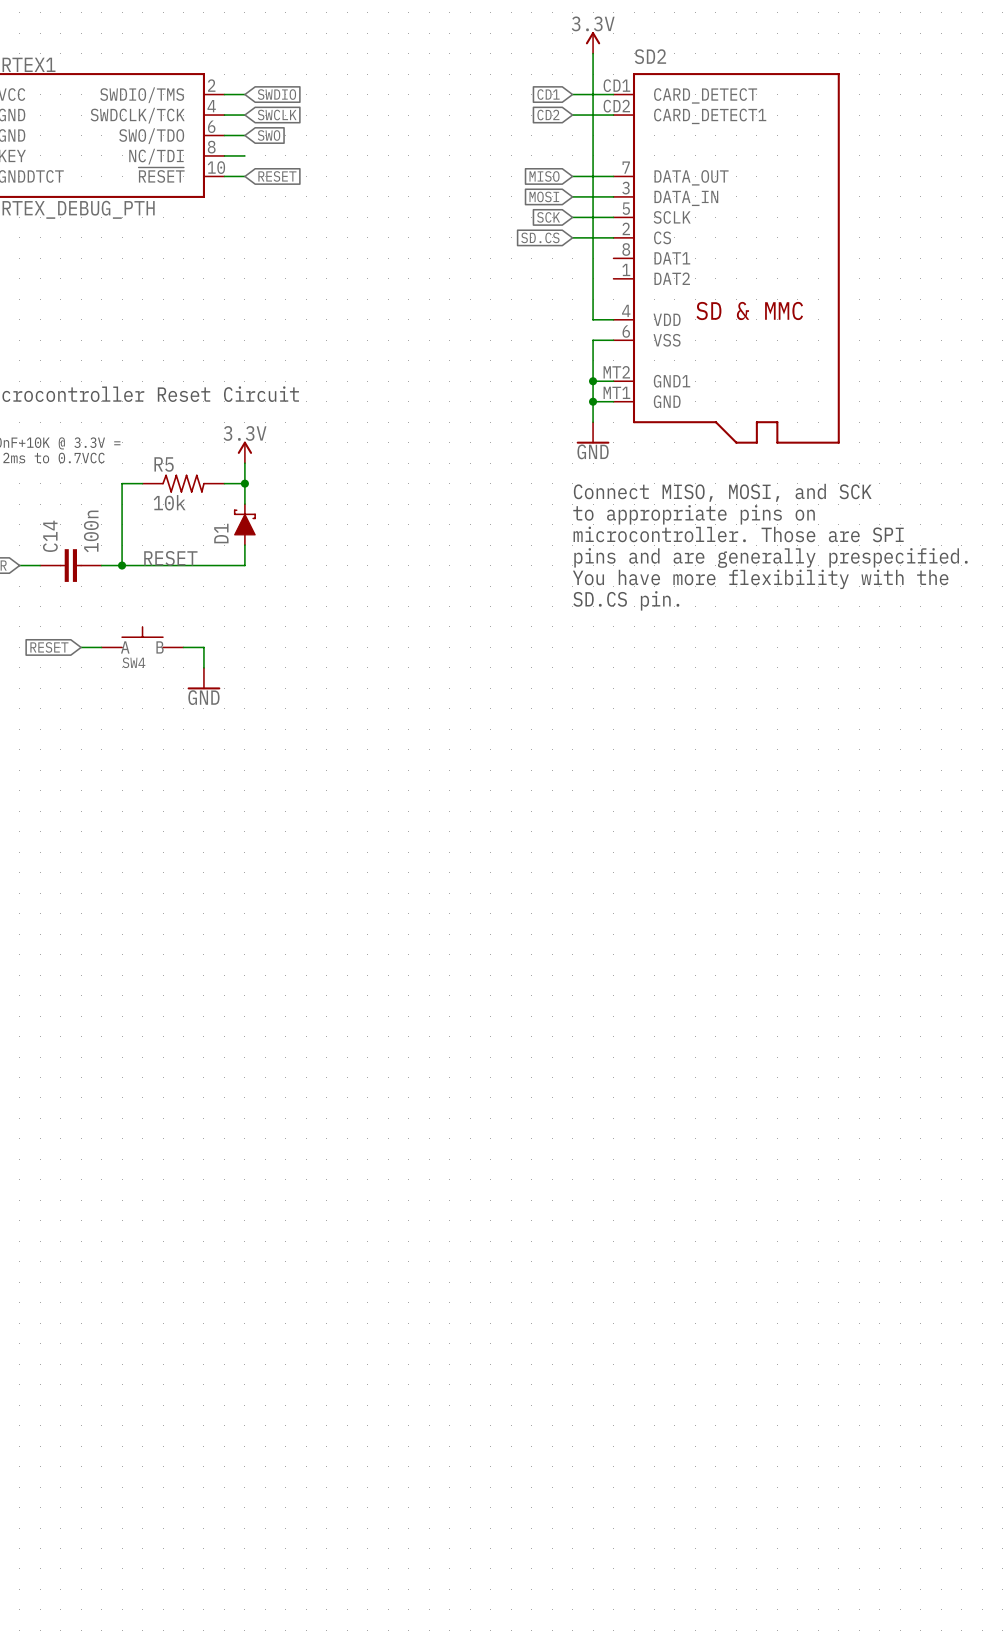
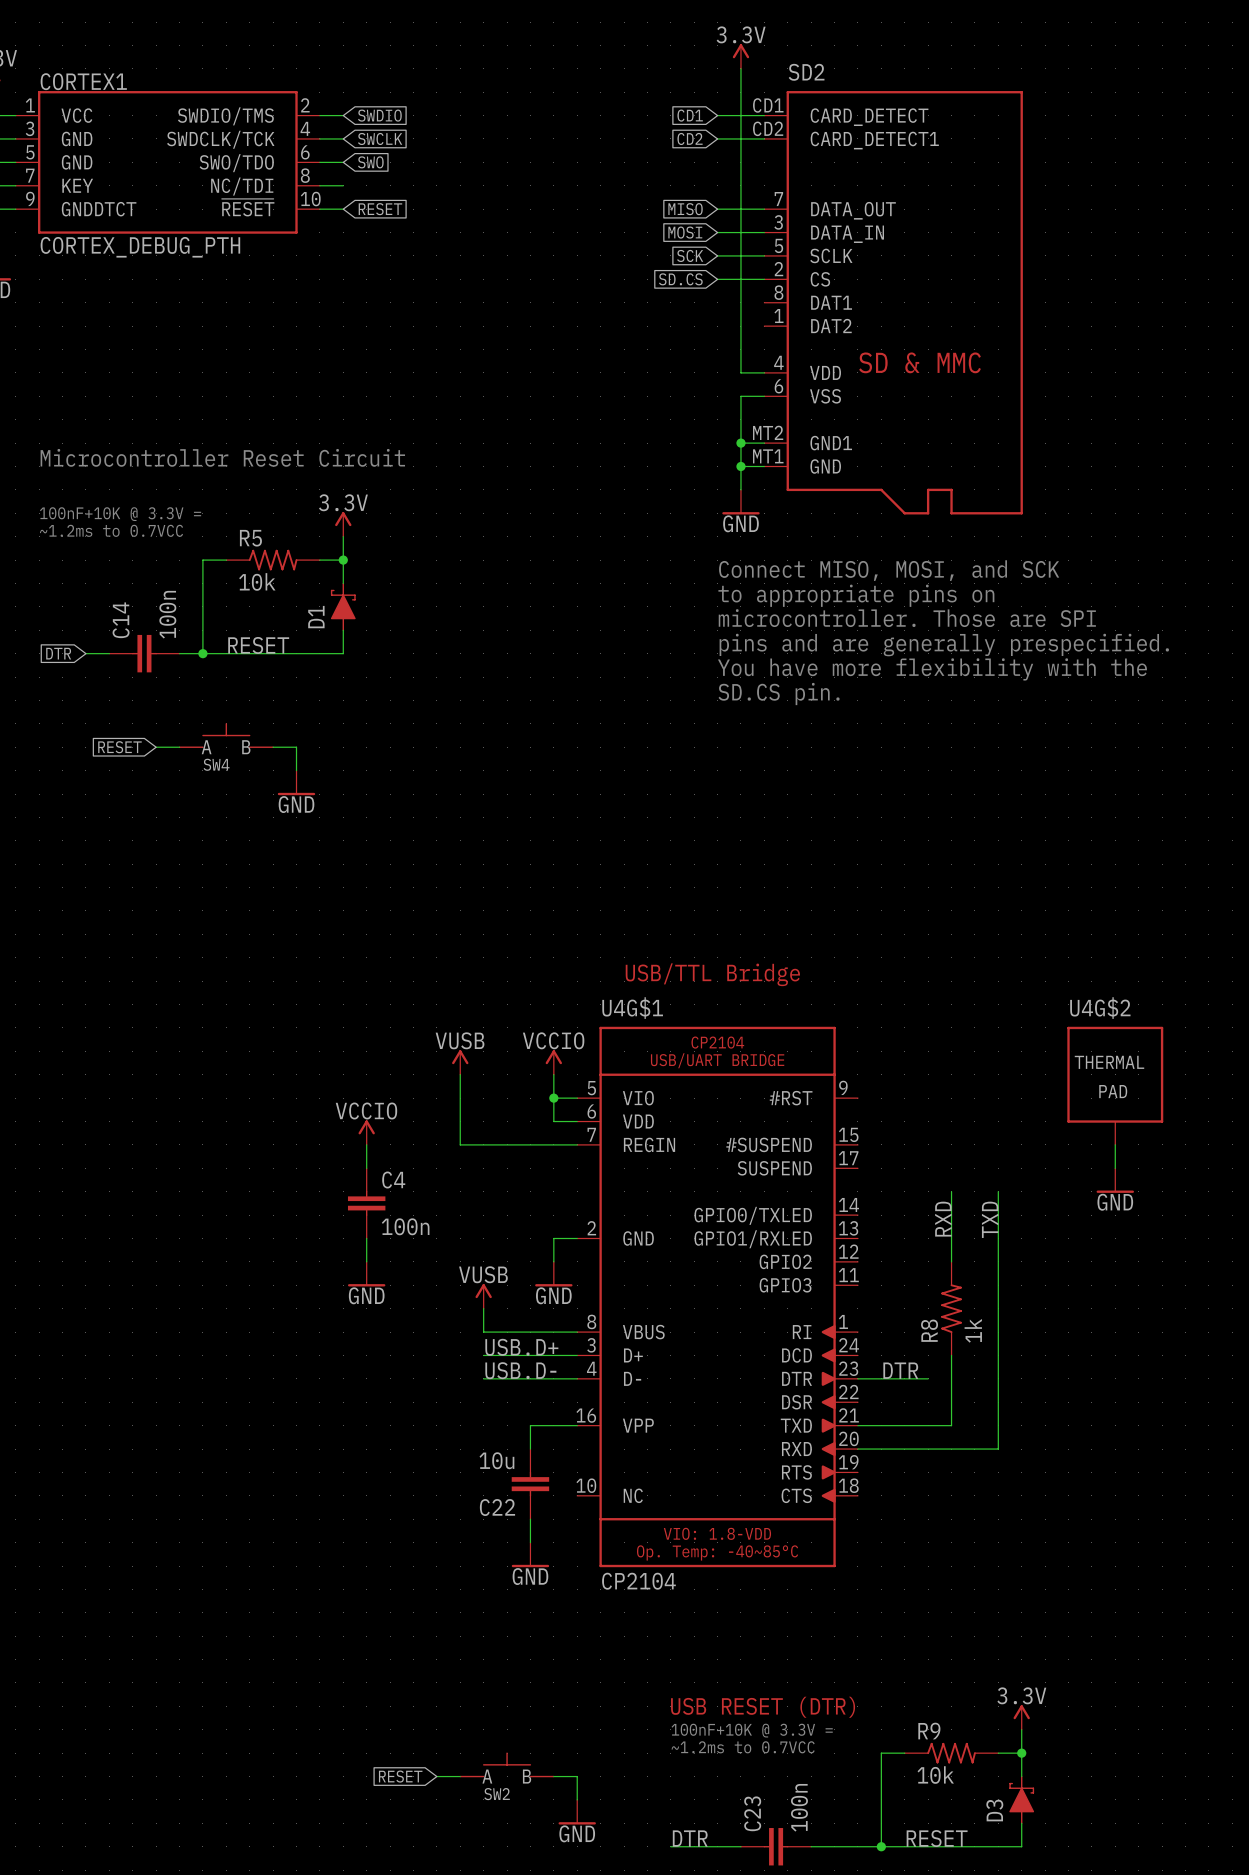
text: none -> USB/TTL Bridge (712, 974)
power symbol: none -> VUSB (460, 1062)
power symbol: none -> VCCIO (553, 1062)
wire: none -> (460, 1074) (460, 1144) (577, 1144)
wire: none -> (553, 1074) (553, 1121) (577, 1121)
U4G$2: none -> (1115, 1085)
wire: none -> (553, 1098) (577, 1098)
junction: none -> (553, 1098)
power symbol: none -> VCCIO (366, 1132)
wire: none -> (366, 1144) (366, 1168)
wire: none -> (1115, 1144) (1115, 1168)
power symbol: none -> GND (1115, 1180)
wire: none -> (951, 1191) (951, 1261)
wire: none -> (998, 1191) (998, 1449) (857, 1449)
C4: none -> 100n (366, 1203)
label: none -> RXD (943, 1219)
label: none -> TXD (990, 1219)
wire: none -> (366, 1238) (366, 1261)
wire: none -> (577, 1238) (553, 1238) (553, 1261)
power symbol: none -> GND (366, 1274)
power symbol: none -> GND (553, 1274)
power symbol: none -> VUSB (483, 1296)
U4G$1: none -> CP2104 (717, 1296)
wire: none -> (483, 1308) (483, 1332) (577, 1332)
R8: none -> 1k (951, 1308)
label: none -> USB.D+ (521, 1347)
wire: none -> (483, 1355) (577, 1355)
wire: none -> (951, 1355) (951, 1425) (857, 1425)
label: none -> USB.D- (520, 1370)
label: none -> DTR (900, 1370)
wire: none -> (483, 1378) (577, 1378)
wire: none -> (857, 1378) (928, 1378)
wire: none -> (577, 1425) (530, 1425) (530, 1449)
C22: none -> 10u (530, 1484)
wire: none -> (530, 1519) (530, 1542)
power symbol: none -> GND (530, 1554)
text: none -> USB RESET (DTR) (763, 1707)
power symbol: none -> 3.3V (1021, 1717)
wire: none -> (1021, 1729) (1021, 1776)
text: none -> 100nF+10K @ 3.3V = (752, 1730)
text: none -> ~1.2ms to 0.7VCC (743, 1747)
wire: none -> (904, 1753) (881, 1753) (881, 1846)
R9: none -> 10k (951, 1753)
wire: none -> (998, 1753) (1021, 1753)
junction: none -> (1021, 1753)
SW2: none -> (507, 1764)
global label: none -> RESET (400, 1776)
wire: none -> (436, 1776) (460, 1776)
wire: none -> (553, 1776) (577, 1776) (577, 1799)
D3: none -> (1021, 1799)
power symbol: none -> GND (577, 1812)
wire: none -> (1021, 1823) (1021, 1846) (811, 1846)
label: none -> DTR (690, 1838)
label: none -> RESET (937, 1838)
wire: none -> (670, 1846) (740, 1846)
C23: none -> 100n (776, 1846)
junction: none -> (881, 1846)

